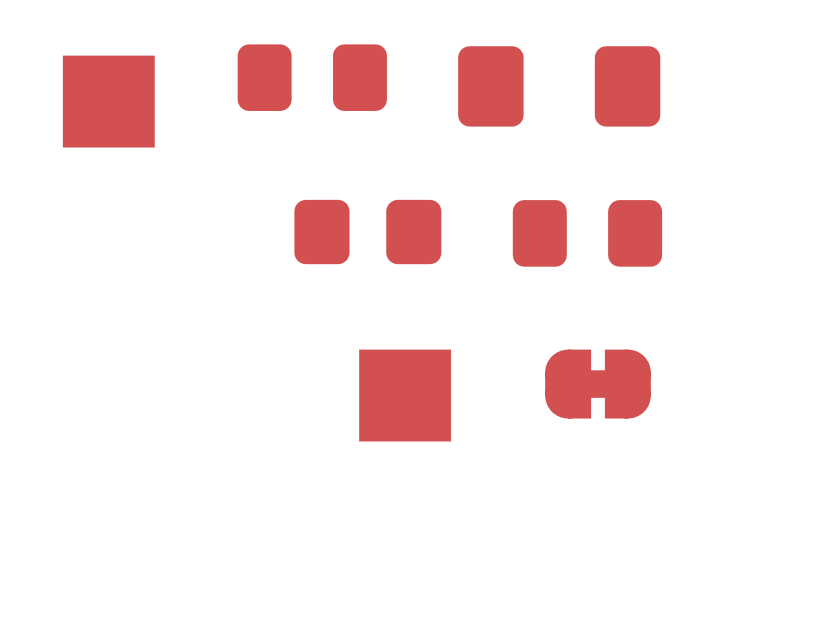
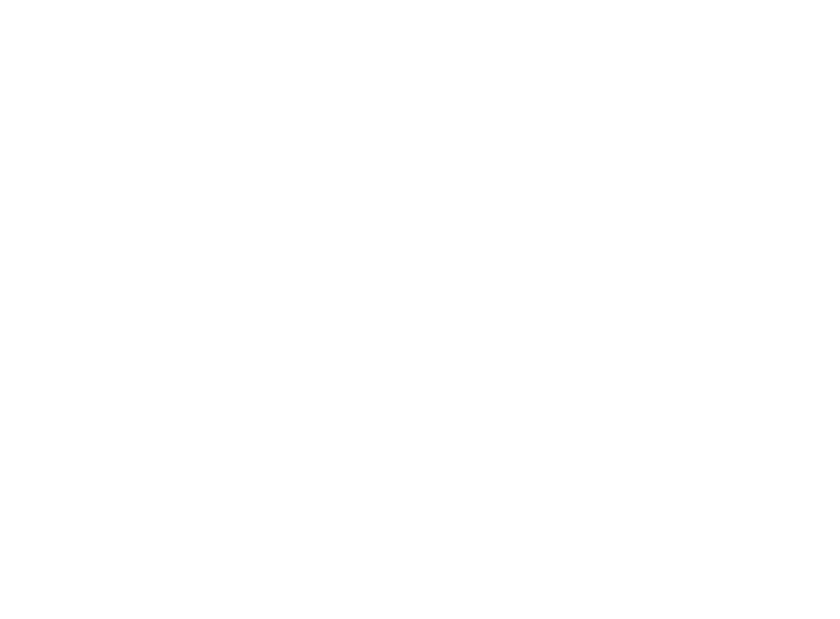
part: (312, 77) -> none
part: (559, 86) -> none
part: (108, 101) -> none
part: (367, 232) -> none
part: (587, 233) -> none
part: (598, 384) -> none
part: (405, 395) -> none

